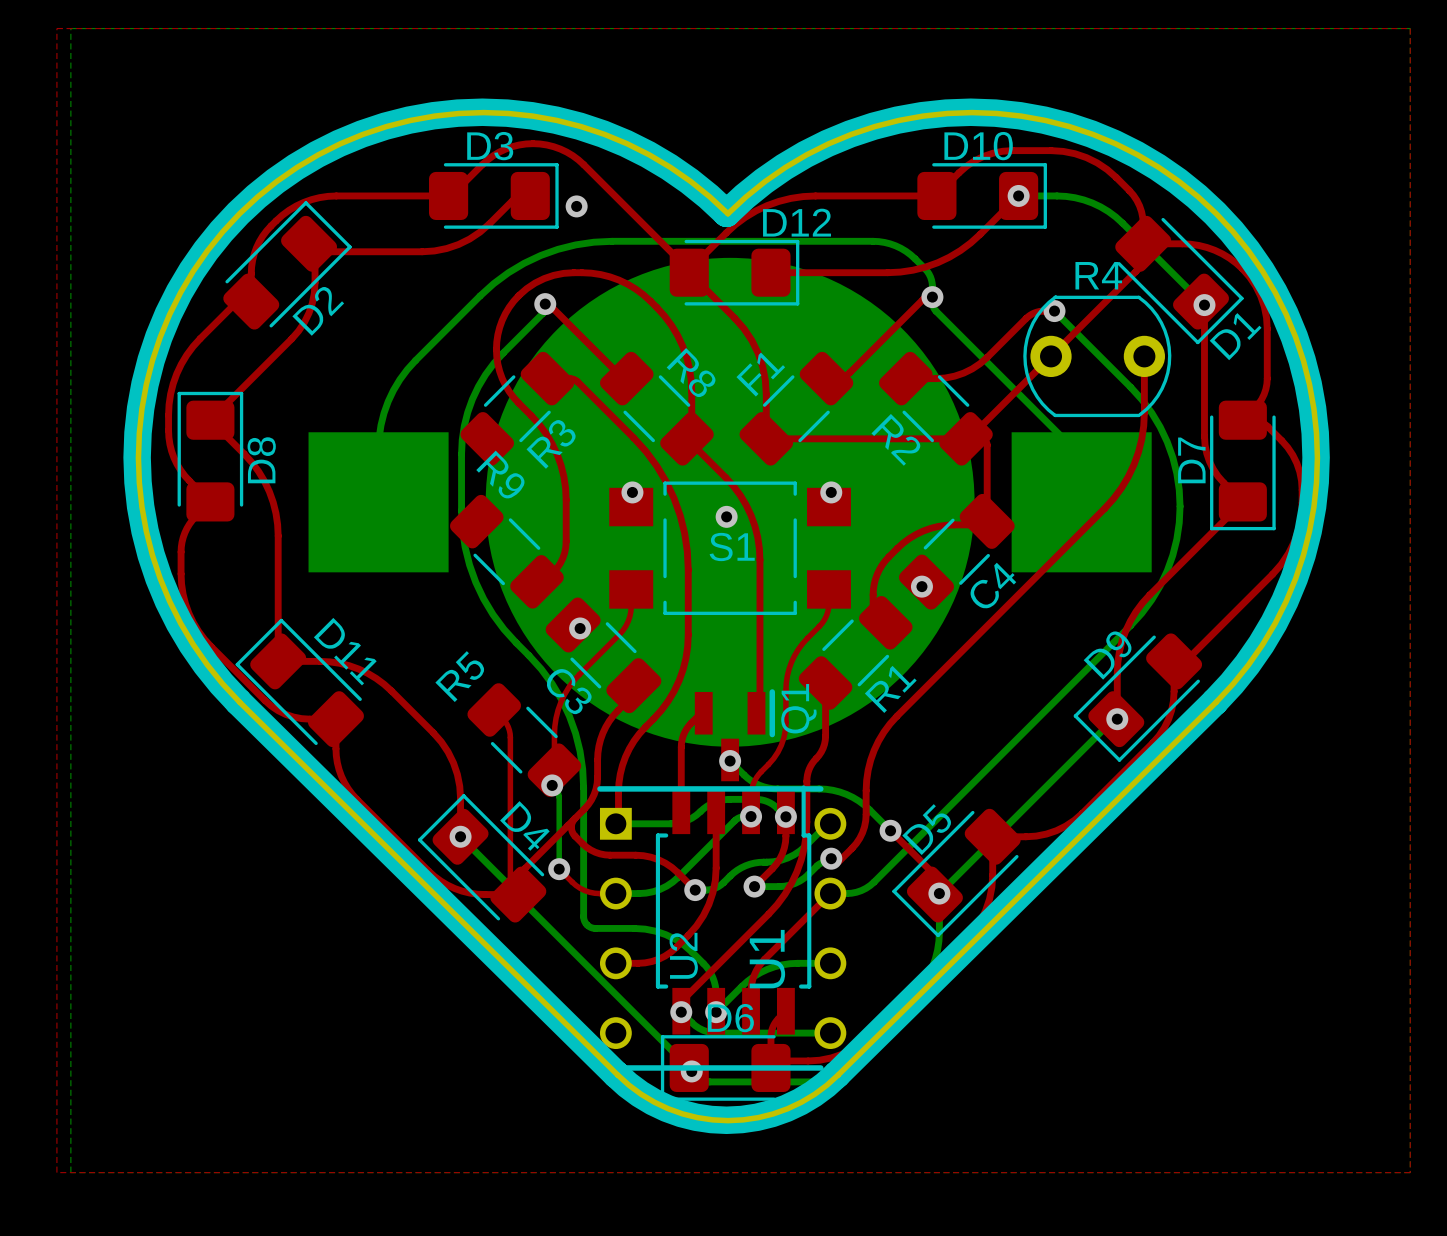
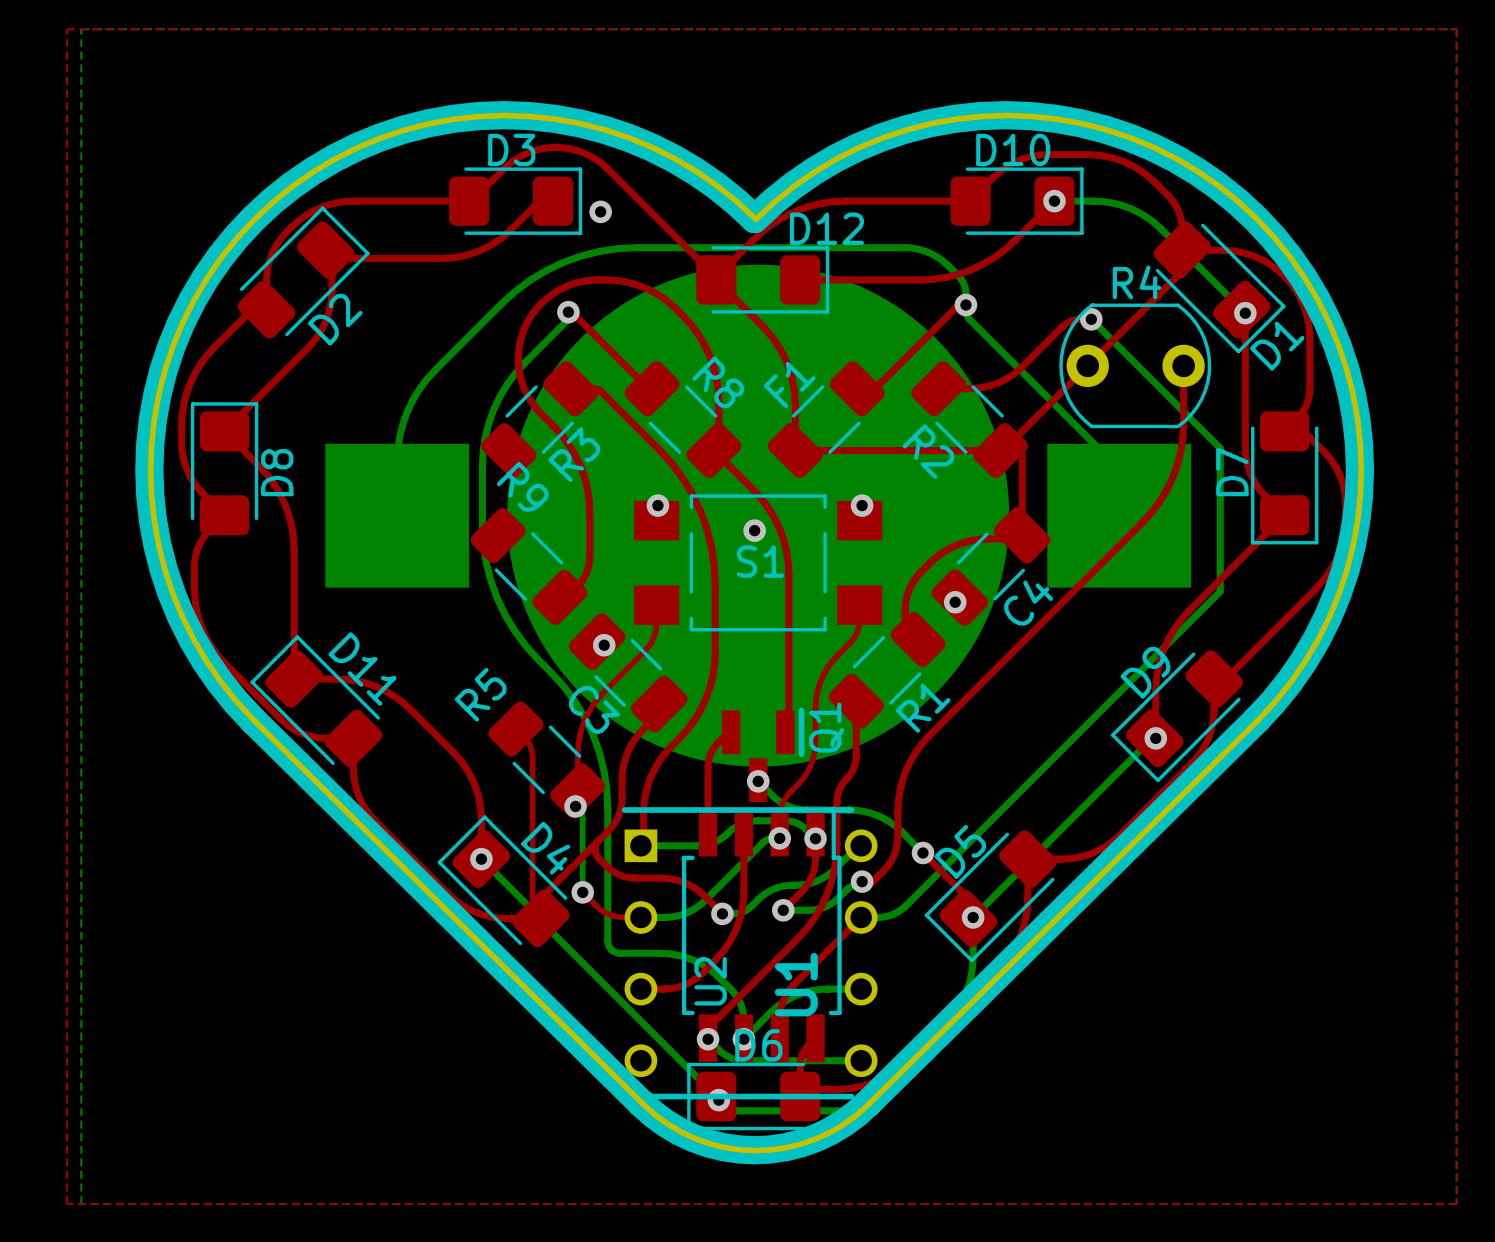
bottom track: (1130, 387) (1151, 412) (1167, 441) (1176, 473) (1180, 506) (1176, 539) (1167, 570) (1151, 599) (1130, 625) -> (1169, 397) (1220, 448) (1220, 591) (1169, 642)

